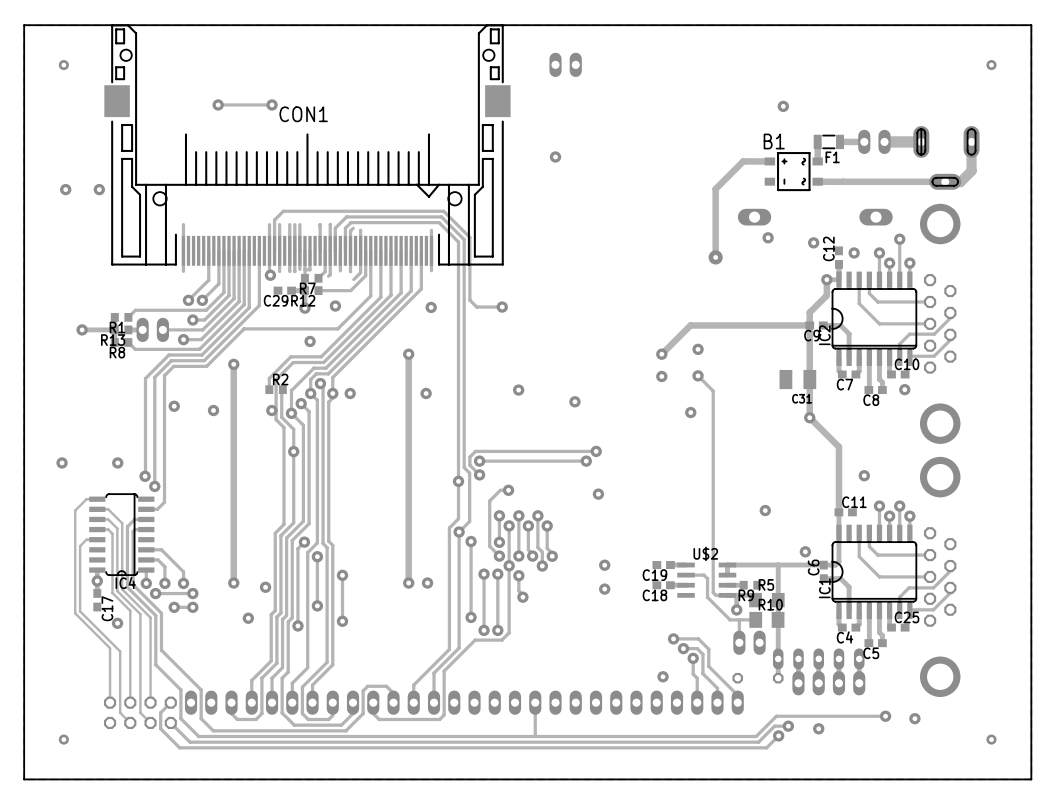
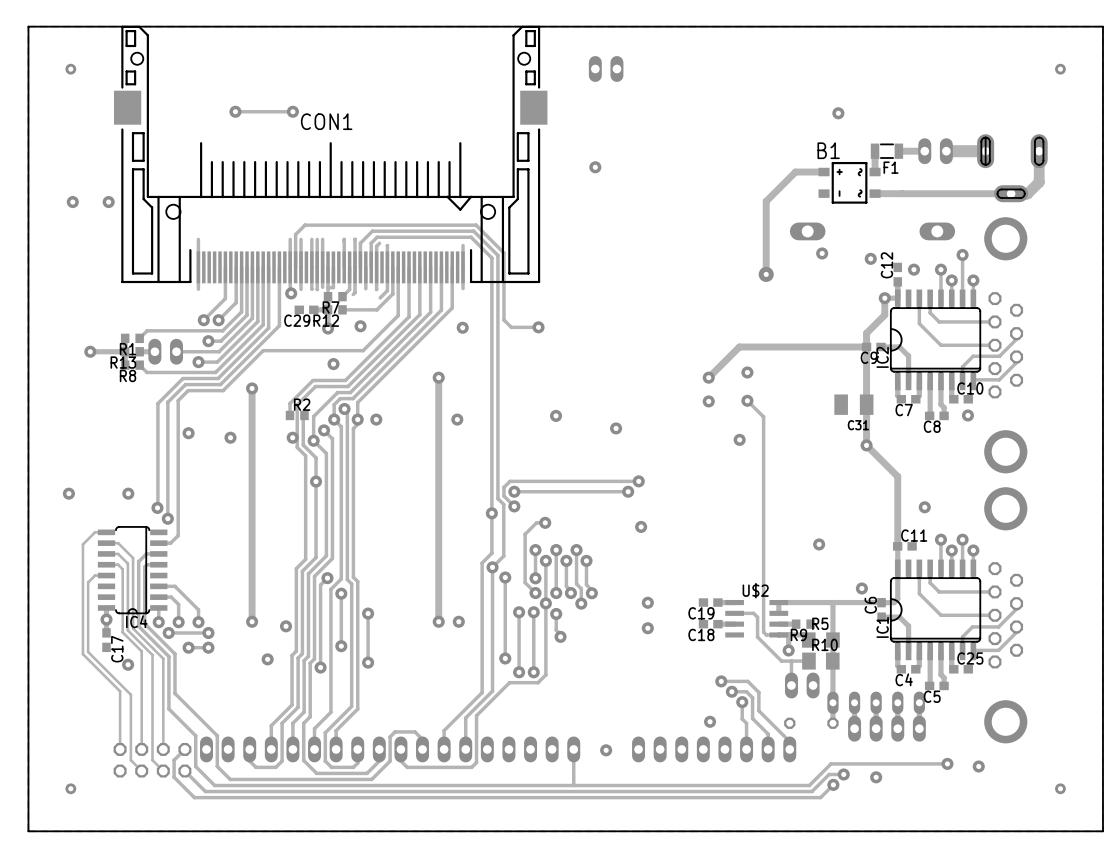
part: (626, 702) -> none
via: none -> (606, 750)

